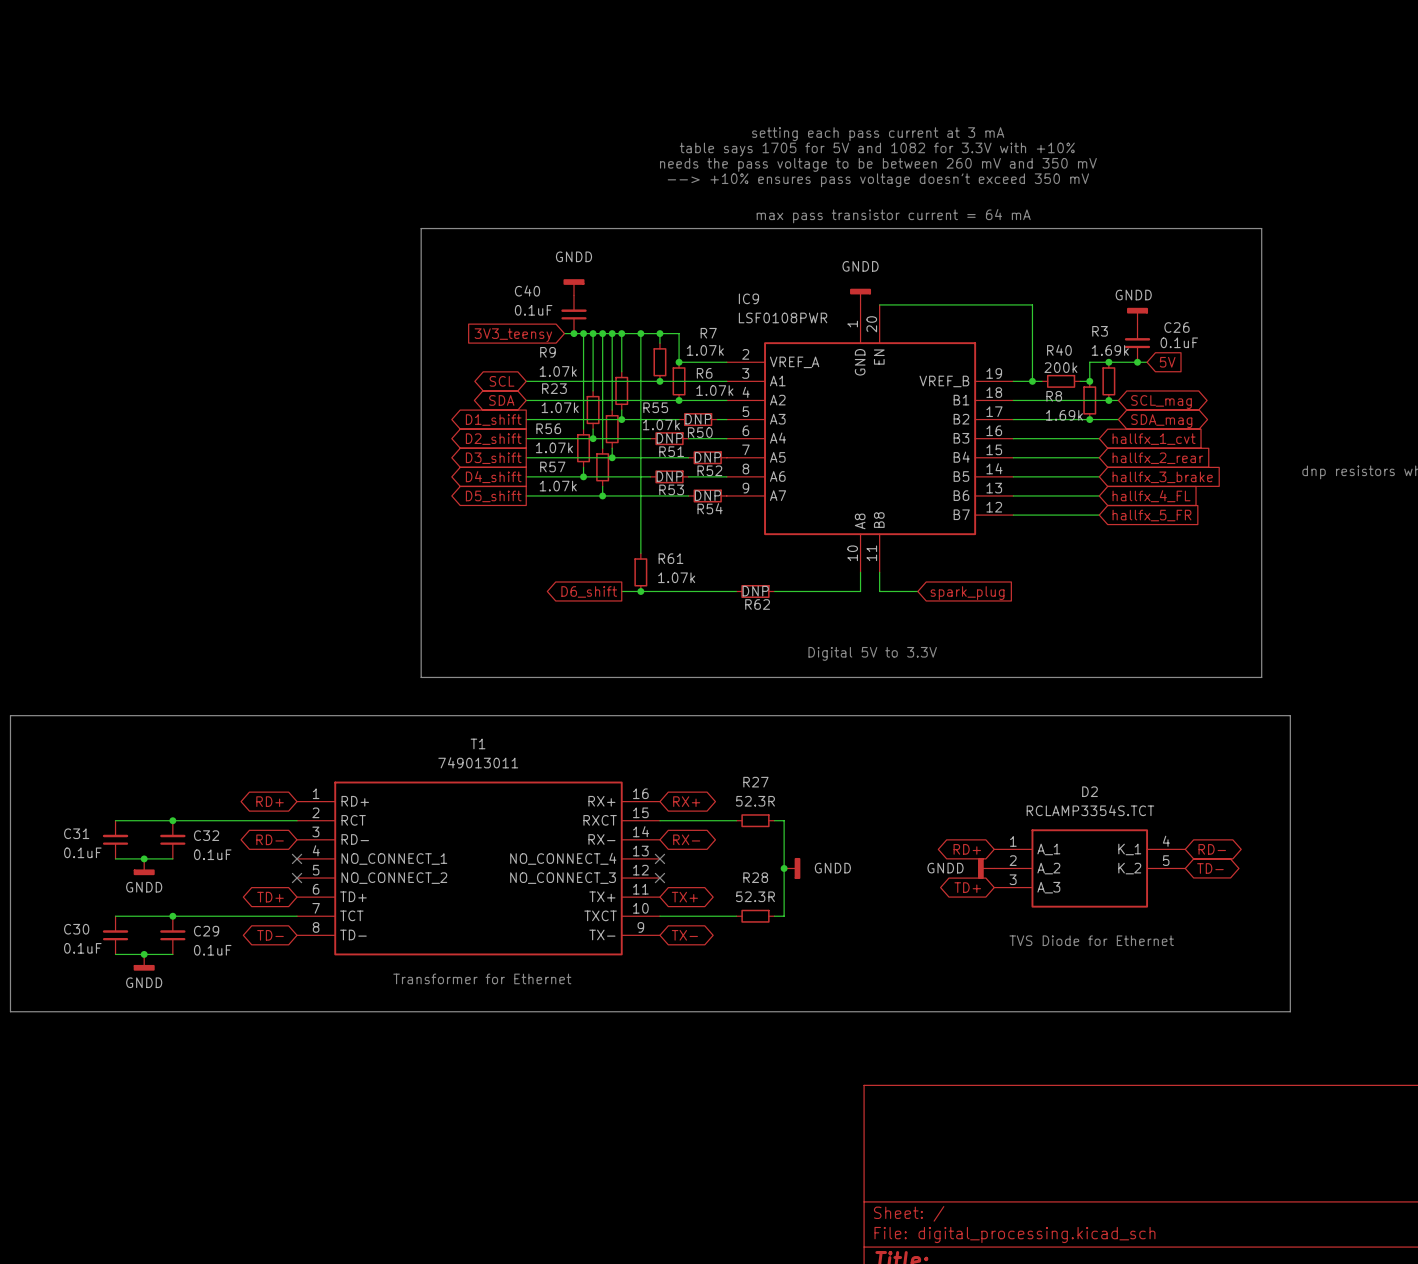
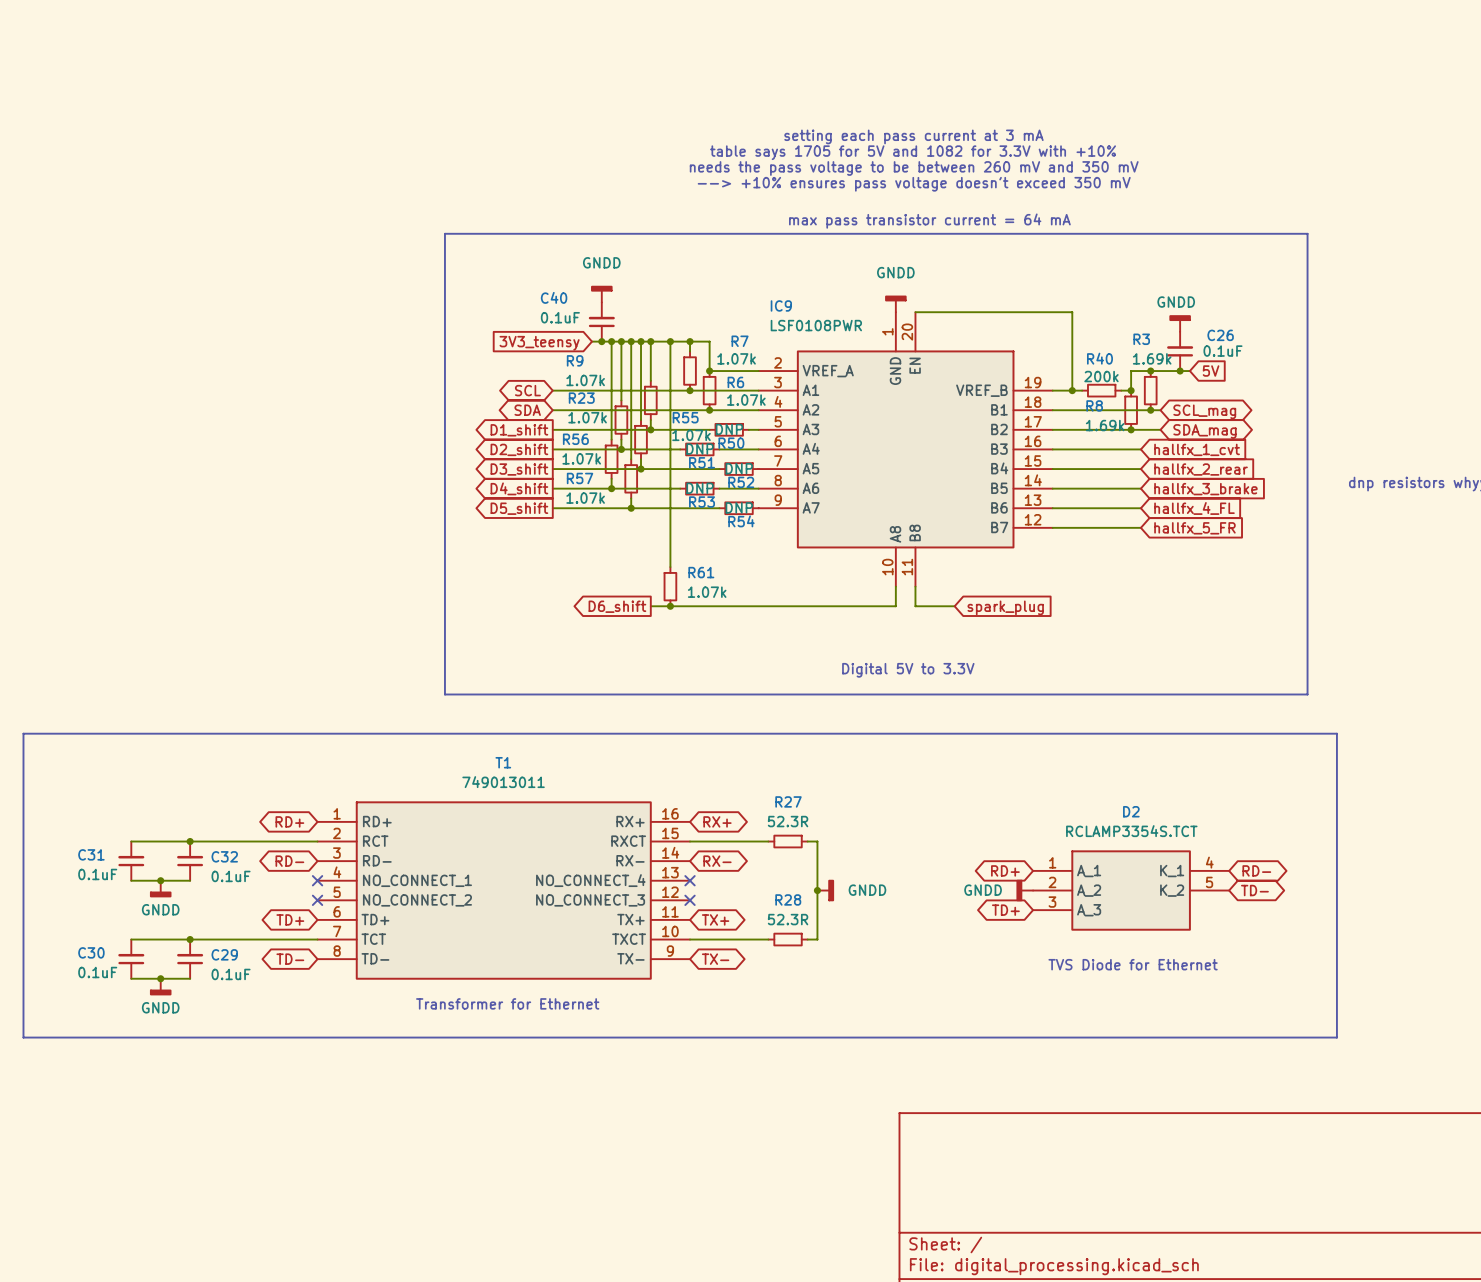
R62: DNP (755, 591) -> none

